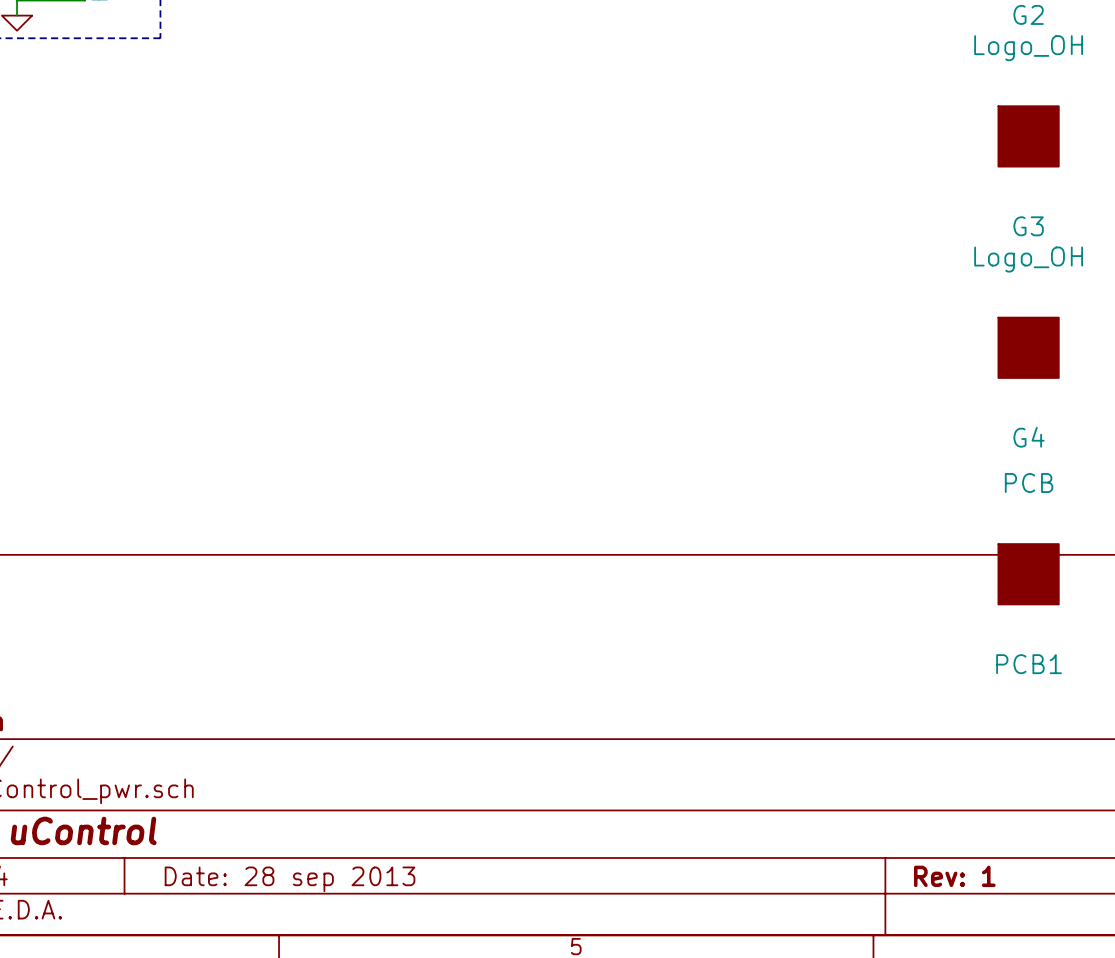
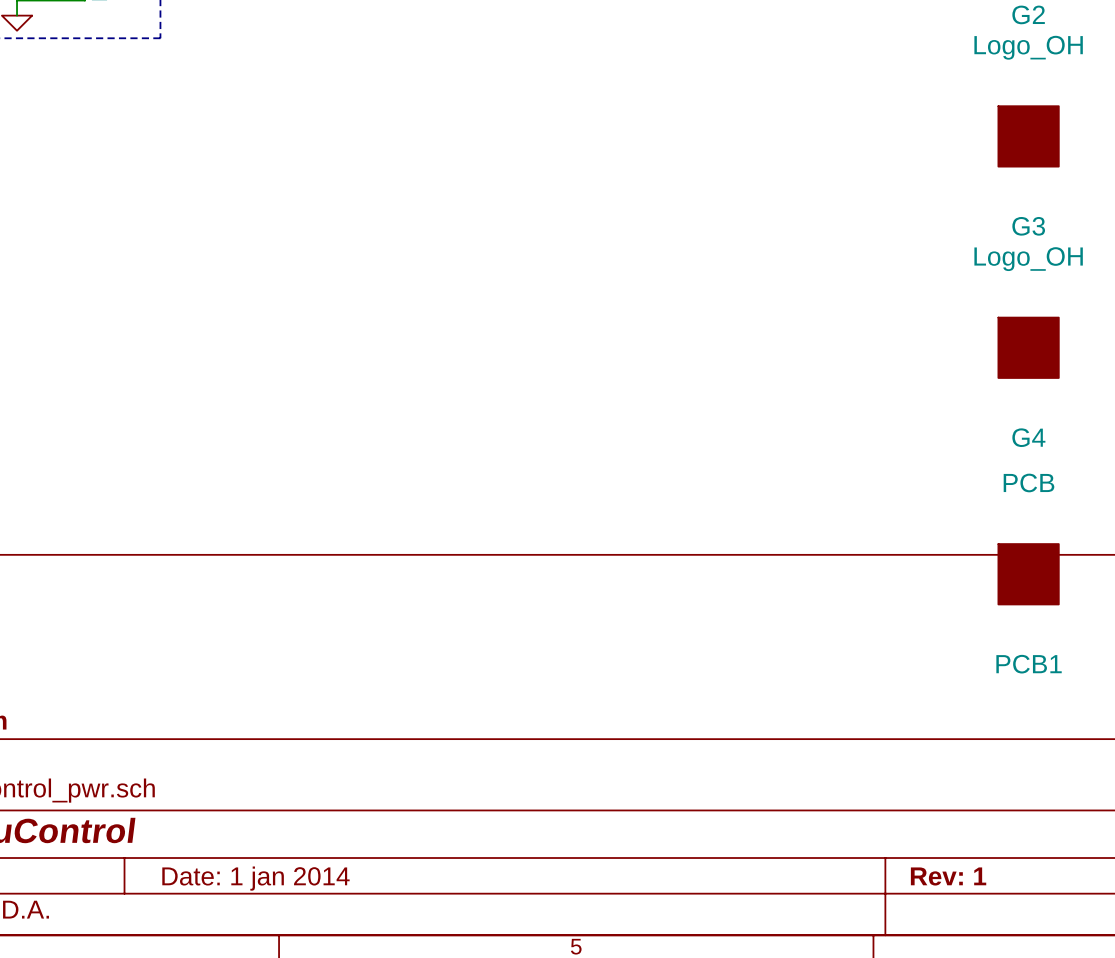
title block: Date: 28 sep 2013 (290, 879) -> Date: 1 jan 2014 (255, 878)

